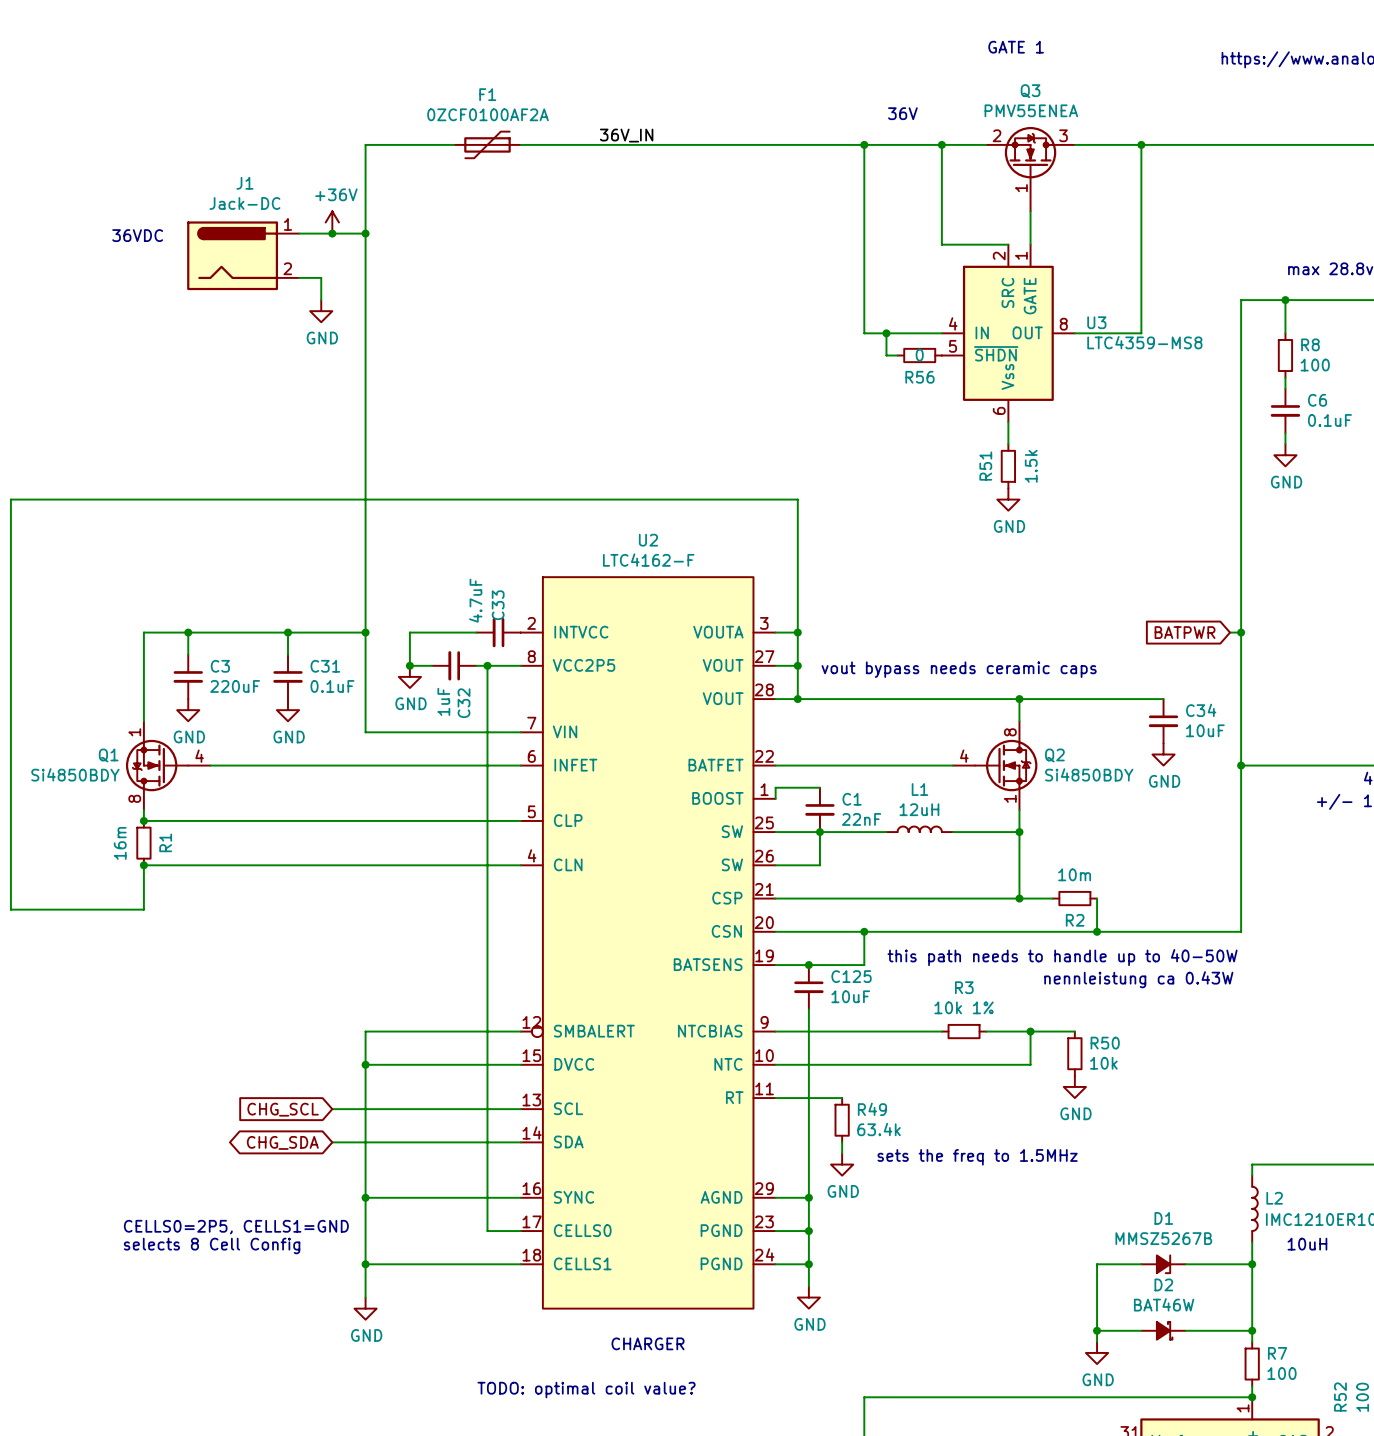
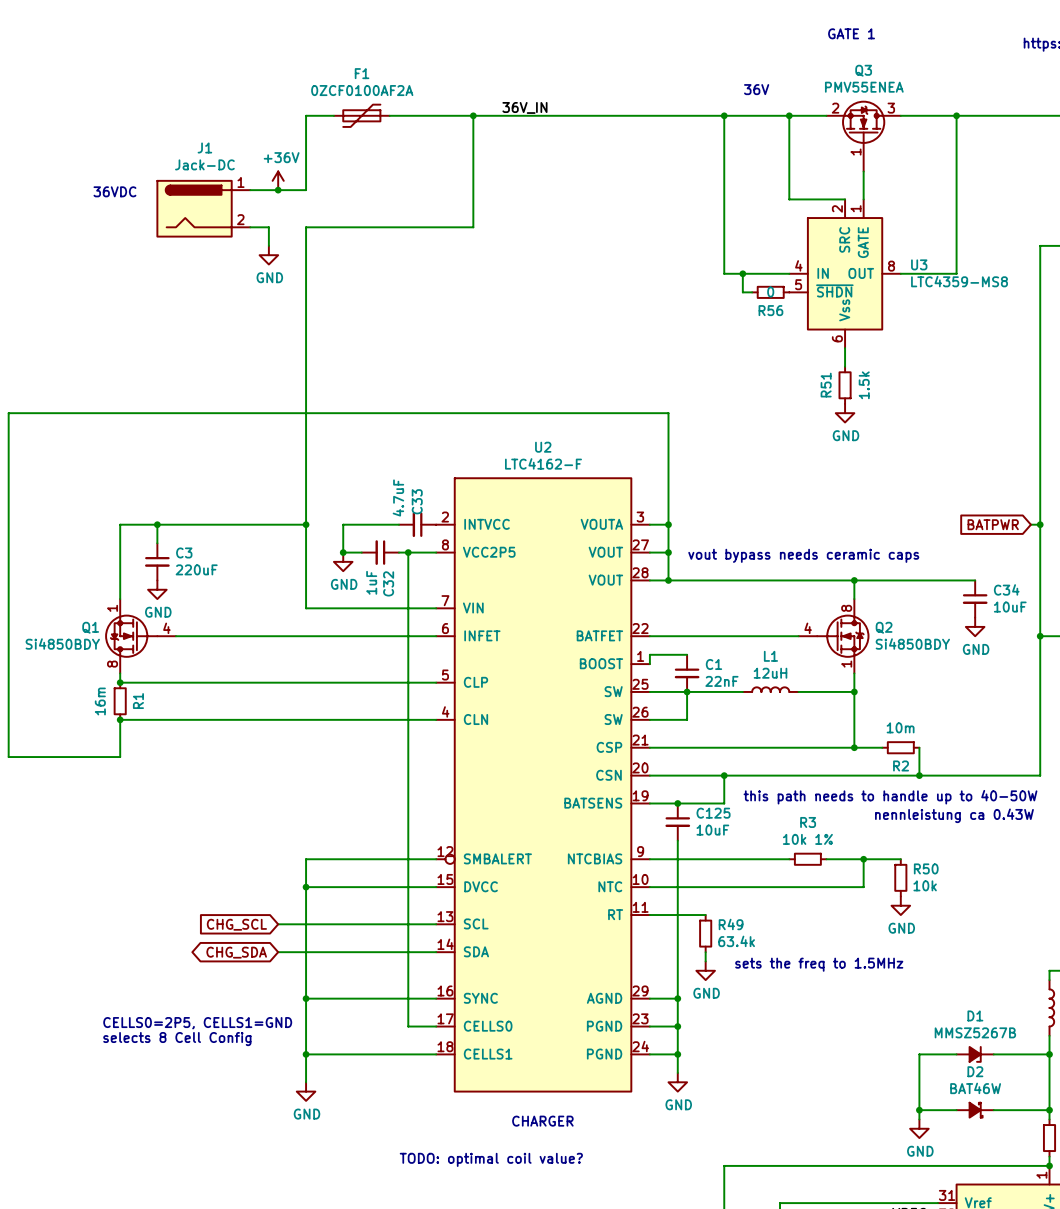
F1 position: (487, 144) -> (361, 115)
junction: none -> (473, 115)
wire: (365, 233) (365, 277) -> (473, 115) (473, 227) (306, 227)
junction: (365, 233) -> none
wire: (287, 632) (287, 654) -> none
junction: (287, 632) -> none
C31: 0.1uF (287, 676) -> none
power symbol: GND (287, 710) -> none

